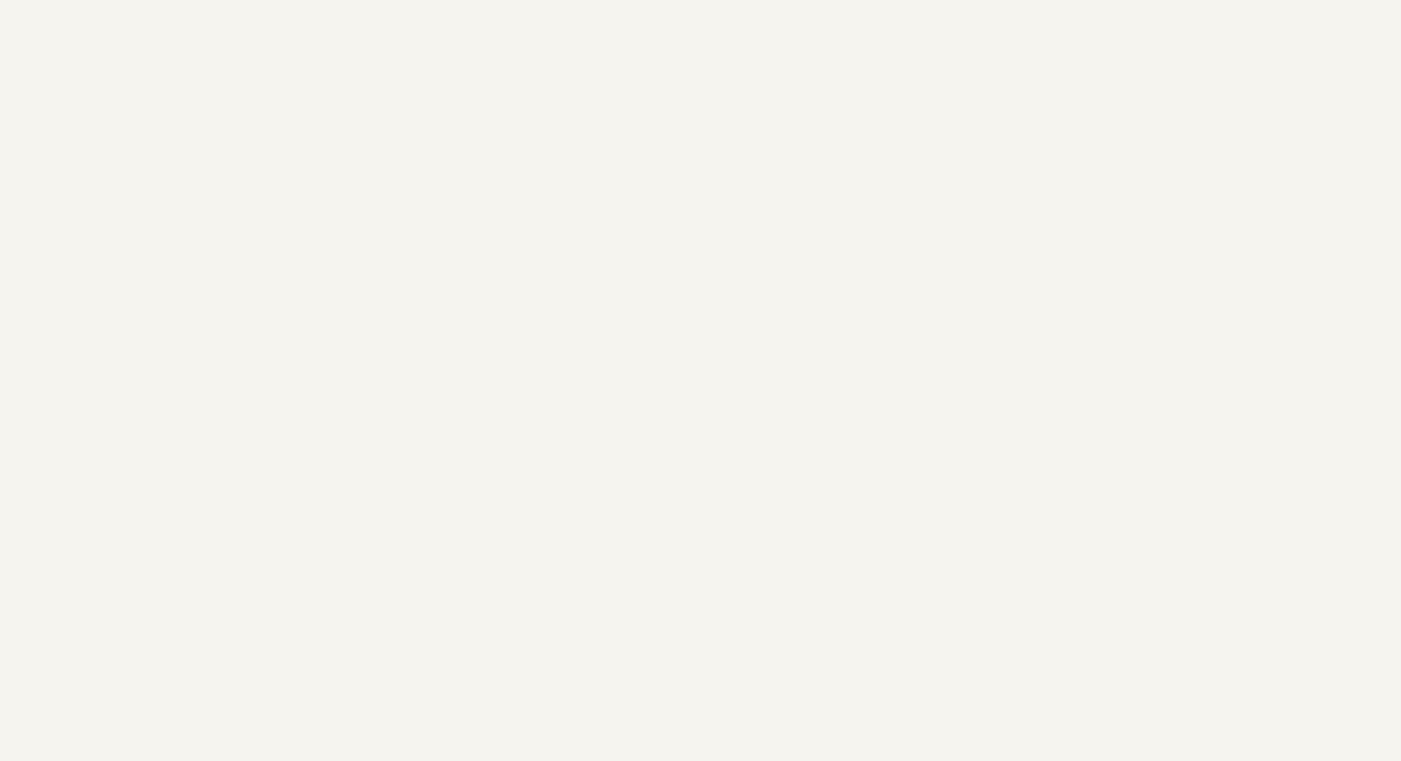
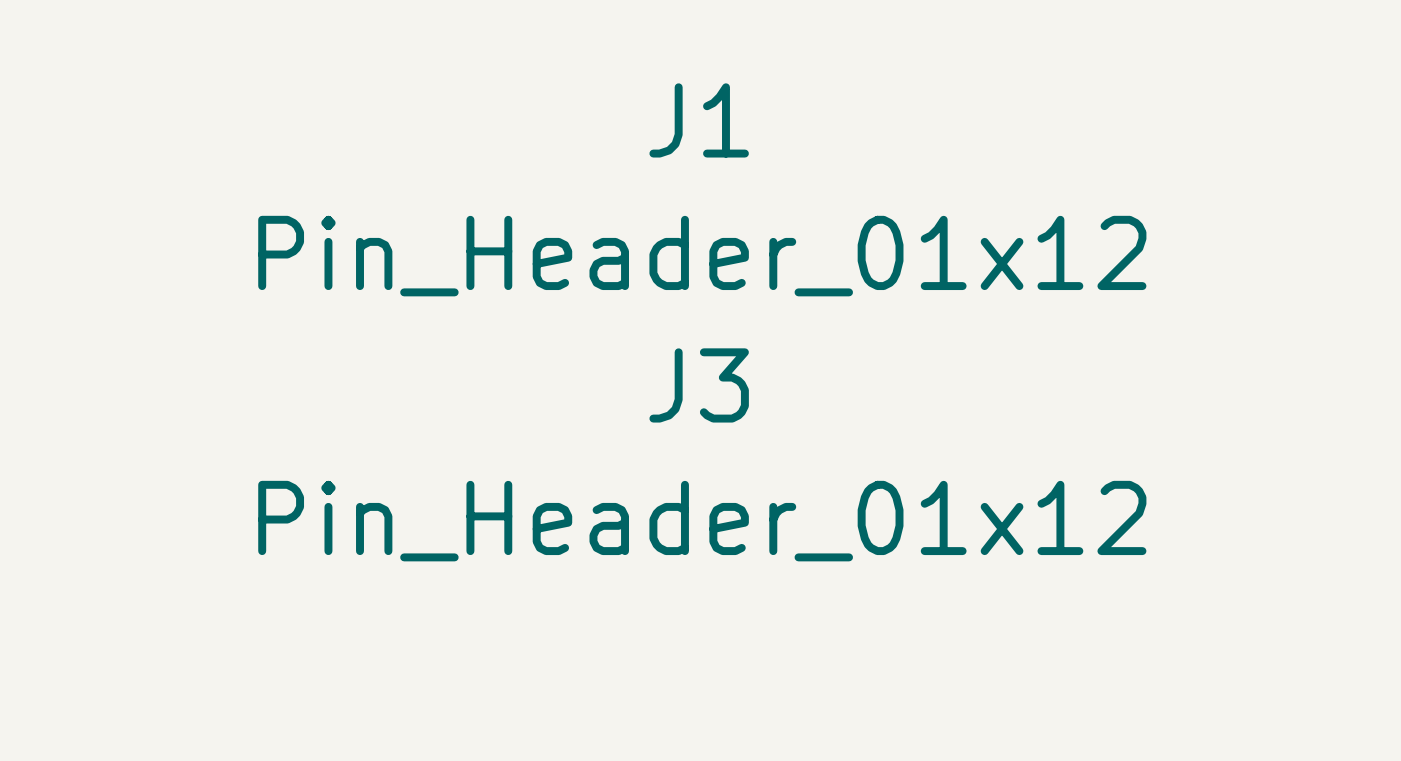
J1: none -> Pin_Header_01x12 (702, 189)
J3: none -> Pin_Header_01x12 (702, 454)

